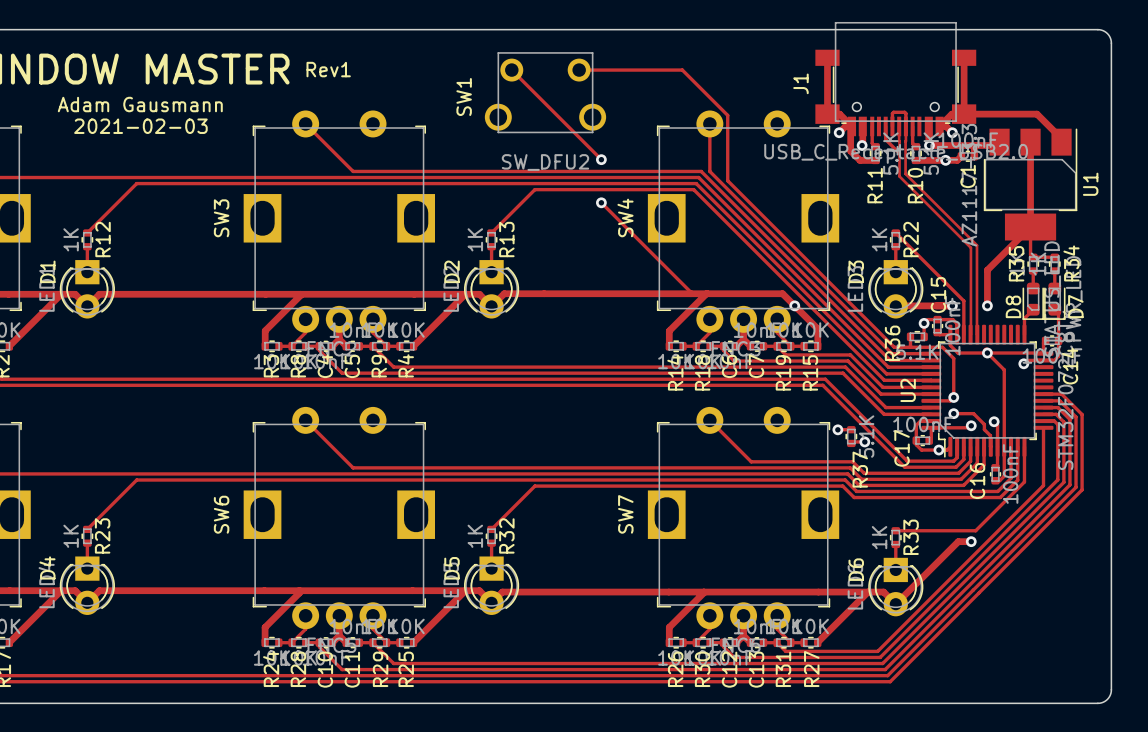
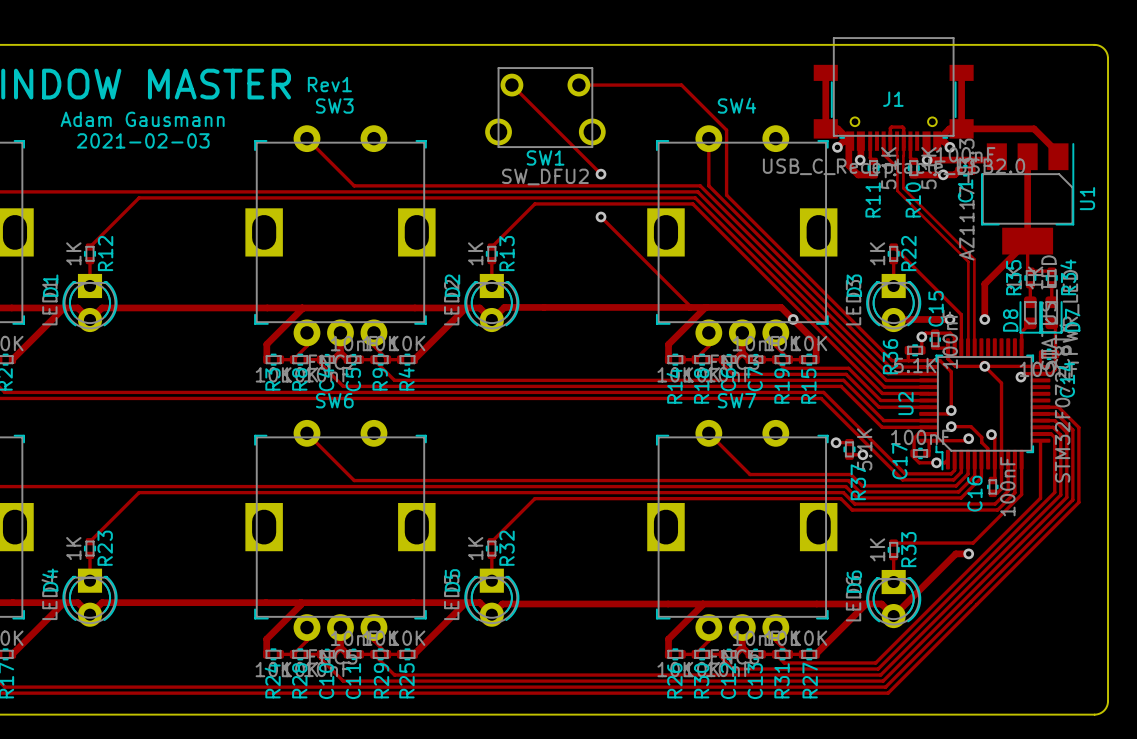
J1 name rotation: 0° (800, 83) -> 90° clockwise (893, 99)
J1 name position: J1 (800, 83) -> J1 (893, 99)
SW1 name rotation: 0° (464, 97) -> 90° clockwise (545, 157)
SW1 name position: SW1 (464, 97) -> SW1 (545, 157)
SW4 name rotation: 0° (625, 217) -> 90° clockwise (736, 105)
SW4 name position: SW4 (625, 217) -> SW4 (736, 105)
SW3 name rotation: 0° (221, 218) -> 90° clockwise (334, 106)
SW3 name position: SW3 (221, 218) -> SW3 (334, 106)
SW6 name rotation: 0° (221, 514) -> 90° clockwise (334, 400)
SW6 name position: SW6 (221, 514) -> SW6 (334, 400)
SW7 name rotation: 0° (625, 514) -> 90° clockwise (736, 400)
SW7 name position: SW7 (625, 514) -> SW7 (736, 400)

